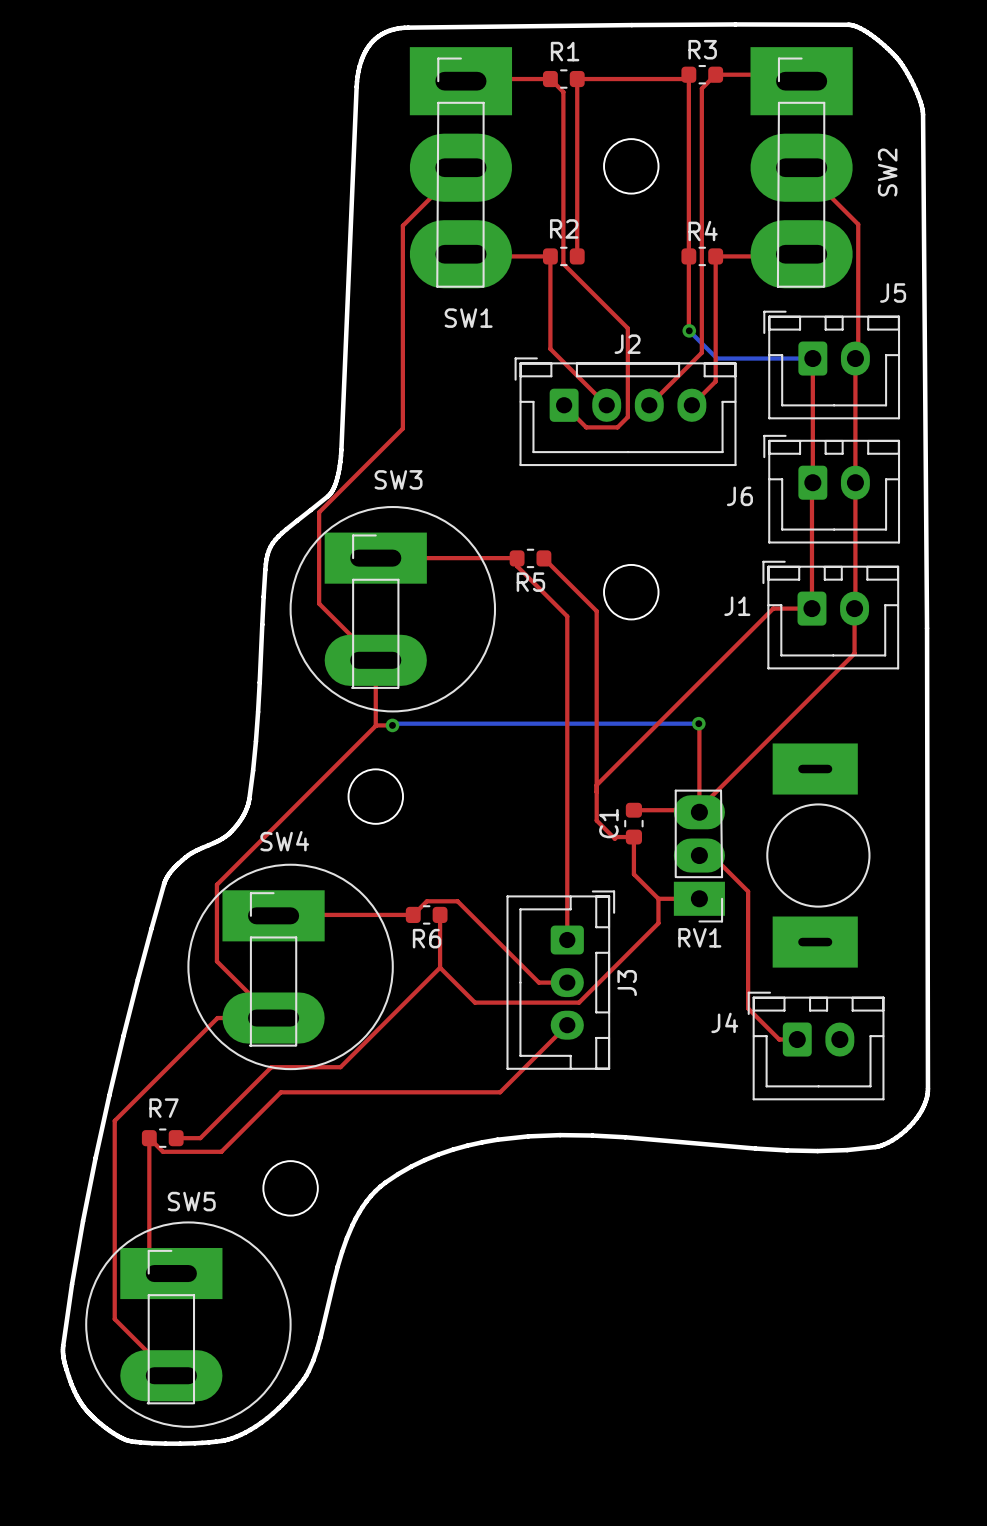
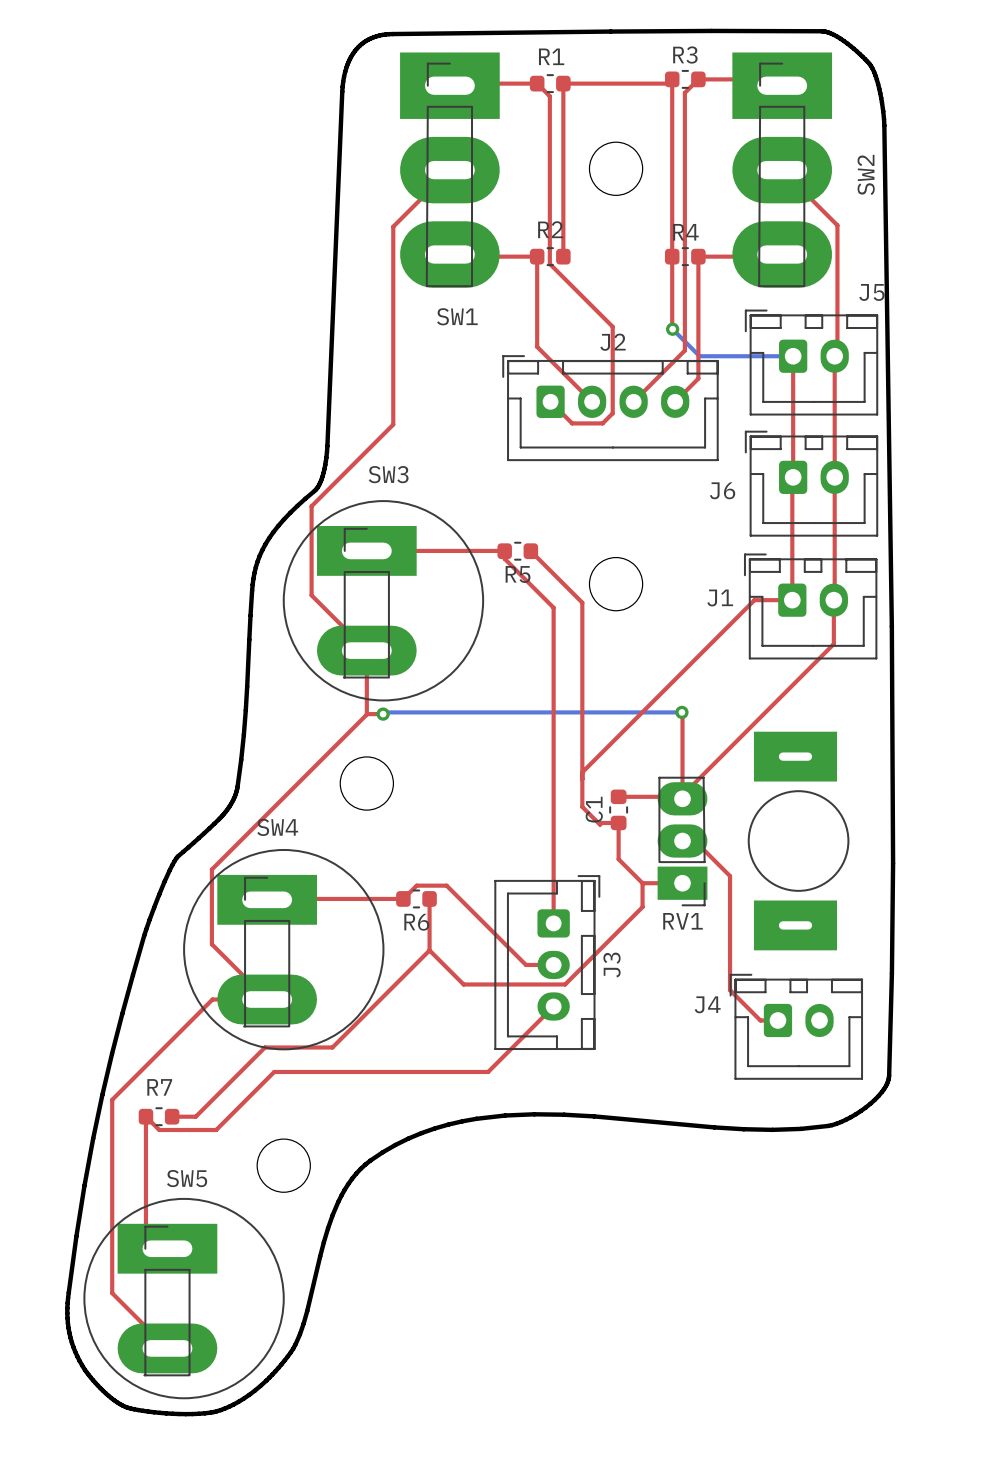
board edge: (735, 24) (404, 27) (391, 30) (378, 36) (369, 45) (363, 56) (356, 86) (341, 450) (337, 477) (329, 495) (282, 533) (268, 550) (265, 569) (255, 741) (248, 803) (241, 819) (228, 833) (188, 855) (172, 869) (164, 882) (137, 979) (109, 1095) (72, 1284) (62, 1349) (70, 1380) (78, 1398) (89, 1413) (108, 1430) (126, 1440) (165, 1443) (224, 1440) (250, 1429) (278, 1408) (303, 1379) (313, 1360) (342, 1252) (359, 1212) (380, 1186) (398, 1174) (424, 1160) (452, 1149) (482, 1142) (528, 1136) (560, 1135) (625, 1137) (787, 1150) (847, 1150) (875, 1147) (887, 1142) (900, 1134) (913, 1122) (923, 1106) (927, 1088) (927, 628) (922, 108) (913, 84) (898, 60) (877, 40) (857, 26) (848, 24) (735, 24) -> (711, 30) (389, 34) (376, 36) (363, 42) (354, 51) (348, 62) (342, 91) (327, 446) (323, 472) (316, 489) (290, 512) (273, 532) (257, 561) (252, 584) (245, 710) (236, 791) (230, 804) (222, 815) (176, 858) (154, 907) (144, 935) (112, 1053) (84, 1185) (68, 1297) (69, 1332) (75, 1351) (86, 1372) (105, 1393) (125, 1406) (172, 1413) (213, 1412) (238, 1401) (266, 1380) (290, 1352) (299, 1334) (328, 1228) (344, 1189) (365, 1164) (408, 1138) (434, 1128) (462, 1121) (505, 1115) (534, 1114) (594, 1116) (743, 1129) (800, 1128) (828, 1125) (841, 1121) (860, 1110) (878, 1095) (887, 1083) (889, 1075) (891, 973) (893, 863) (891, 626) (884, 125) (881, 102) (876, 79) (870, 64) (850, 46) (830, 33) (821, 31) (711, 30)

